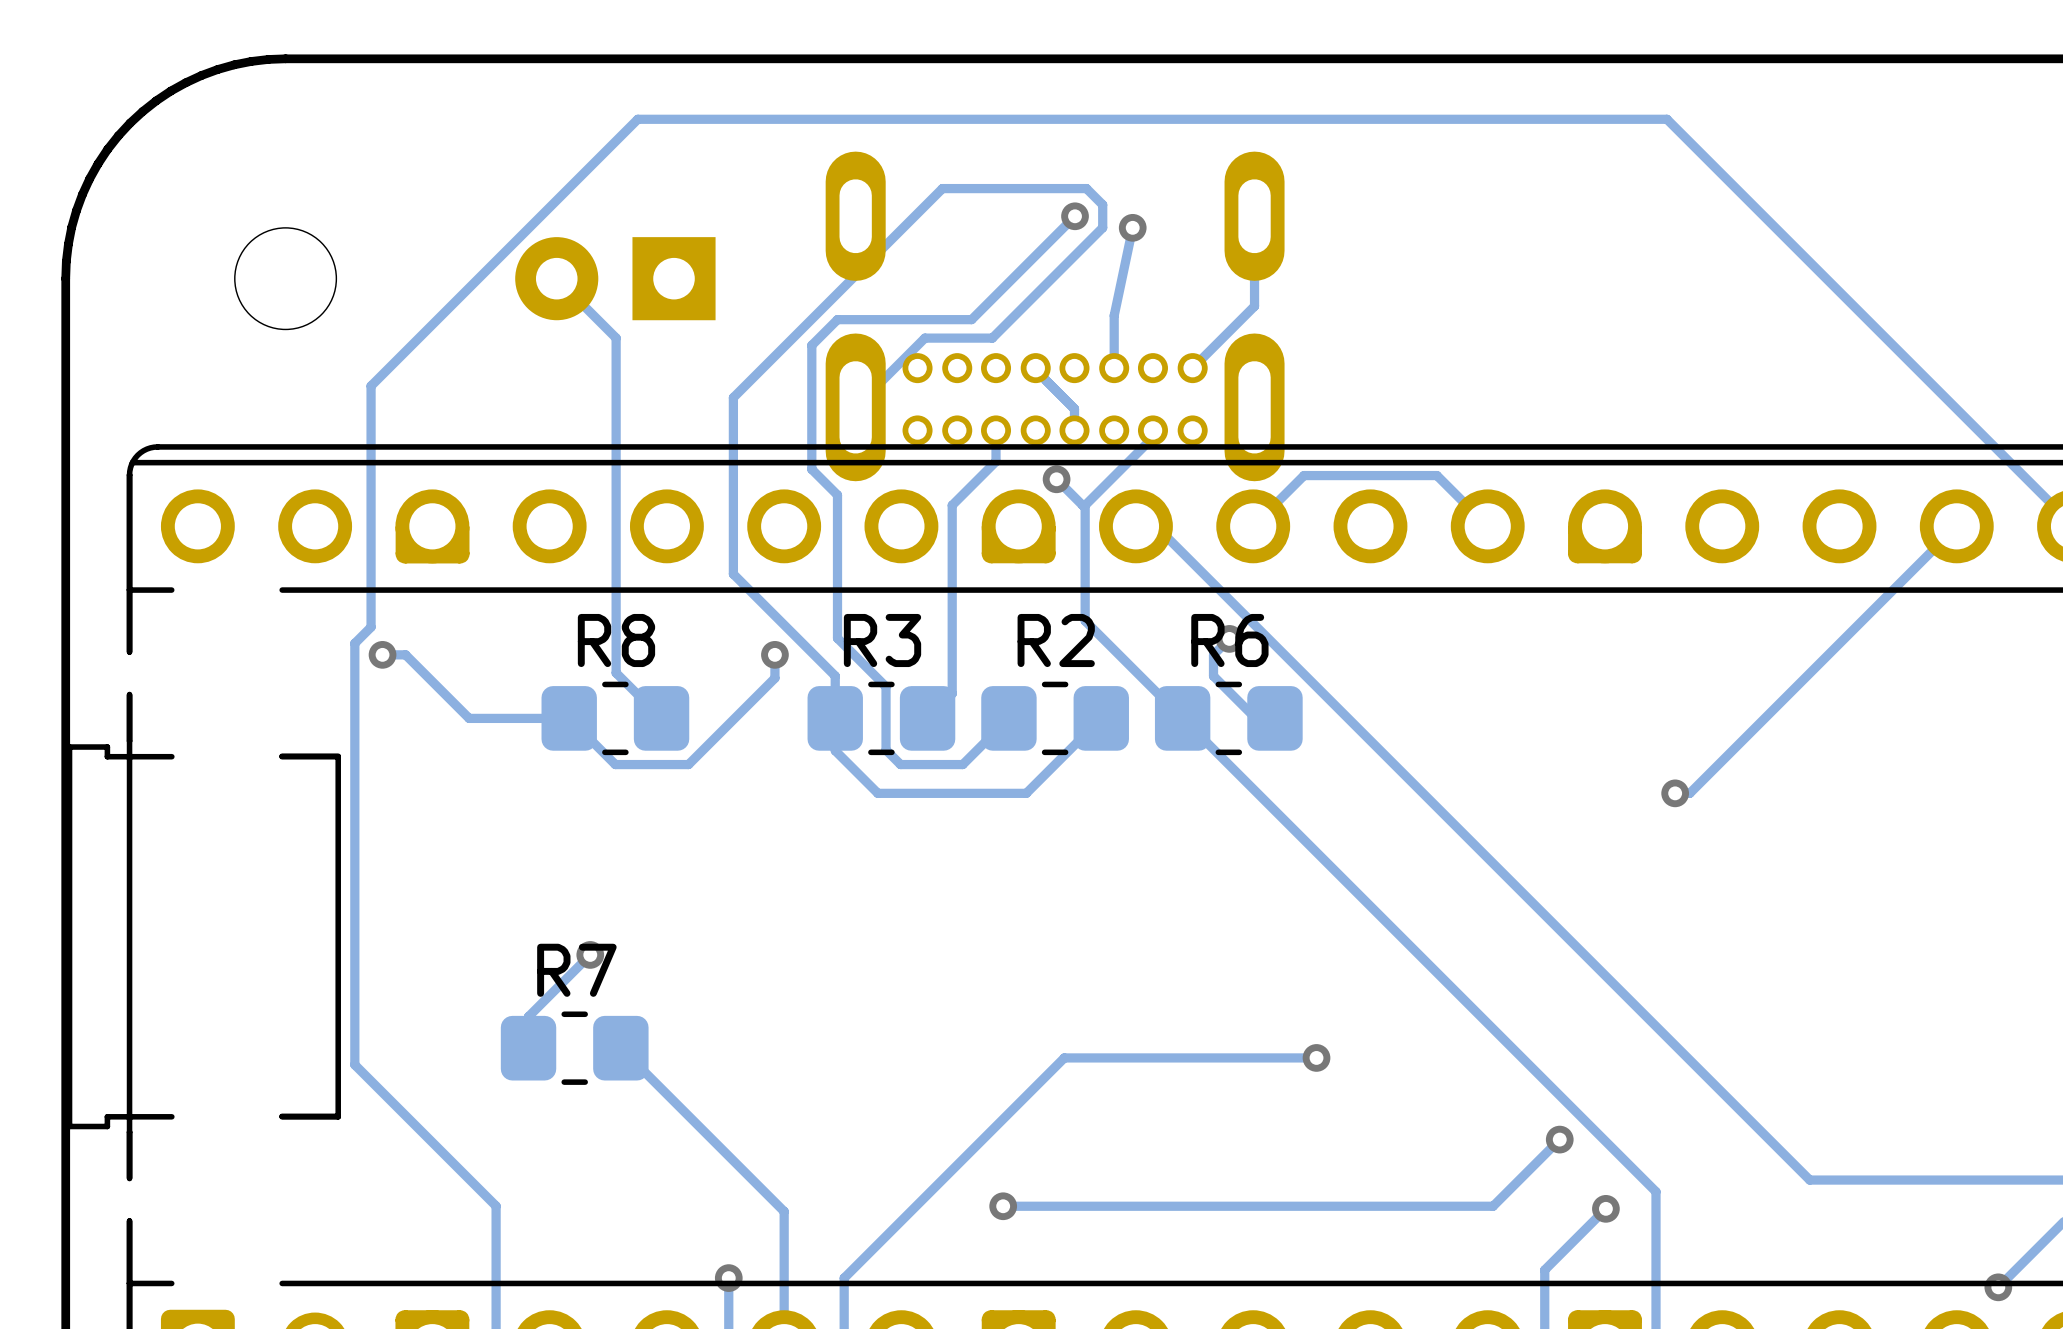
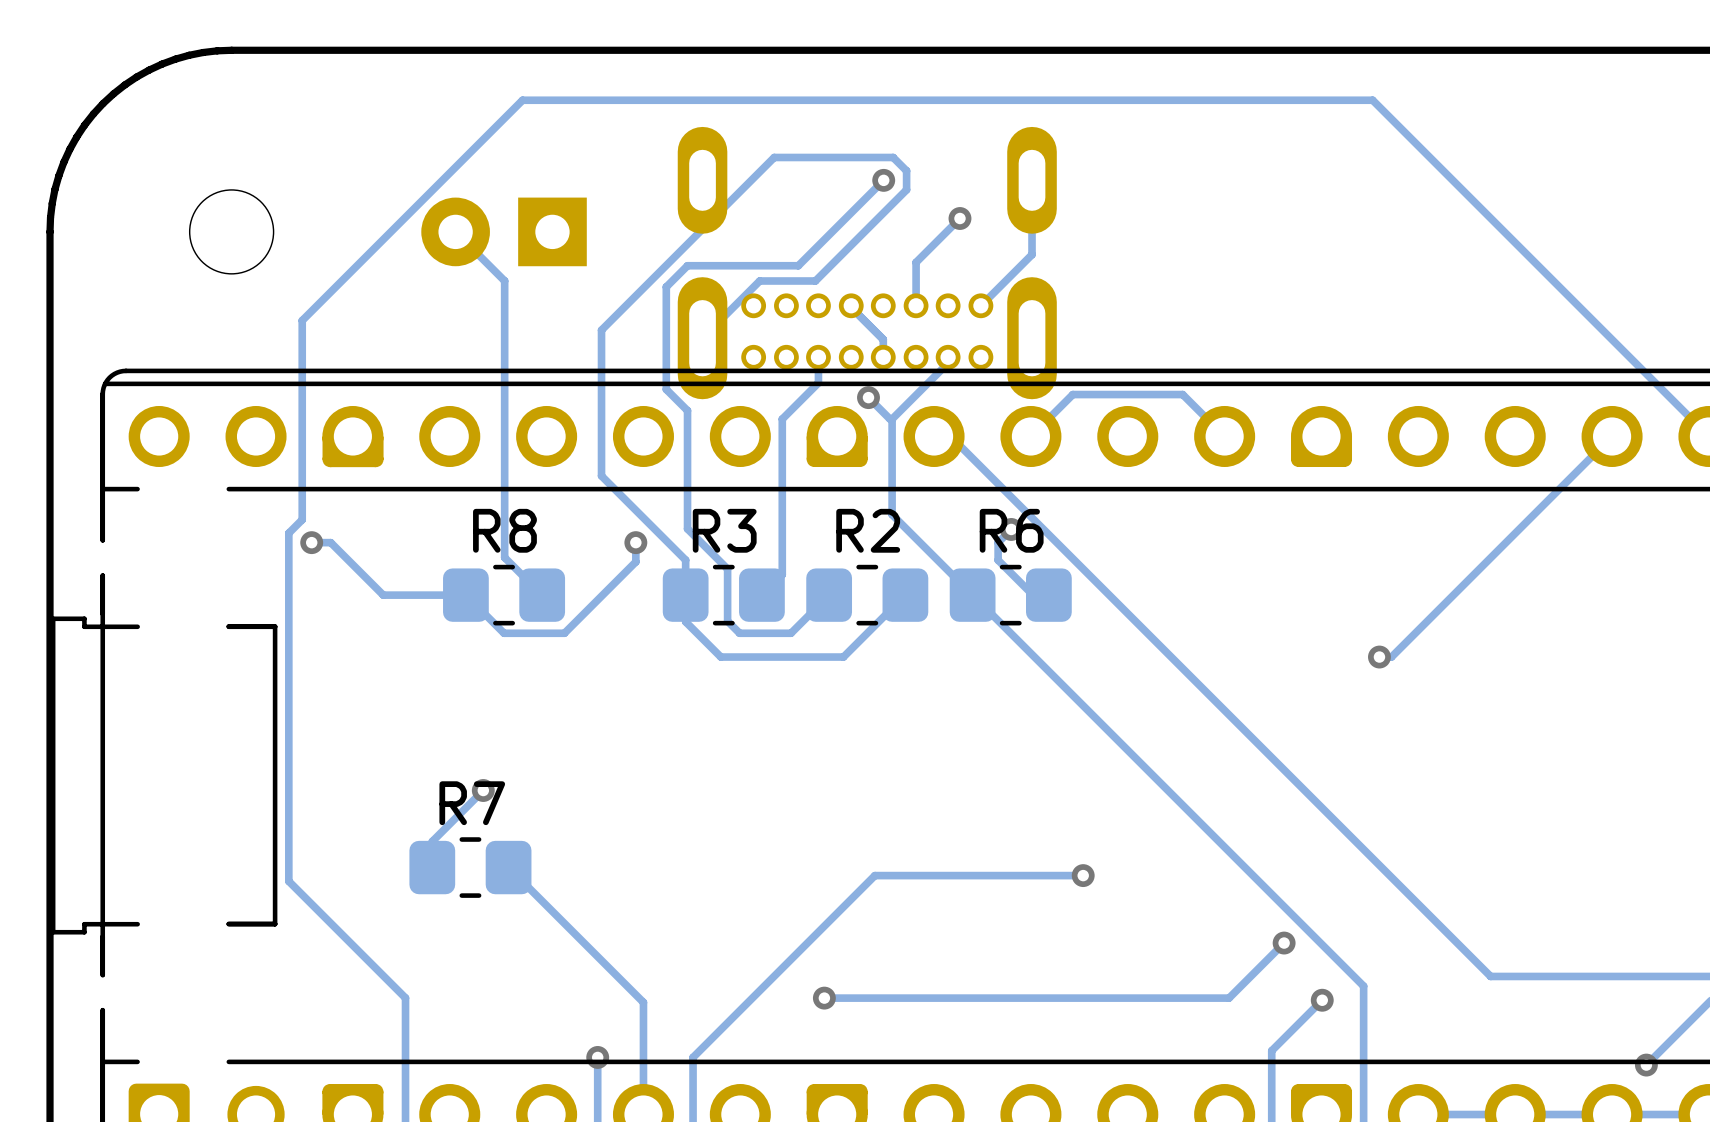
track: (1132, 227) (1114, 315) -> (959, 218) (916, 262)
via position: (1132, 227) -> (959, 218)

